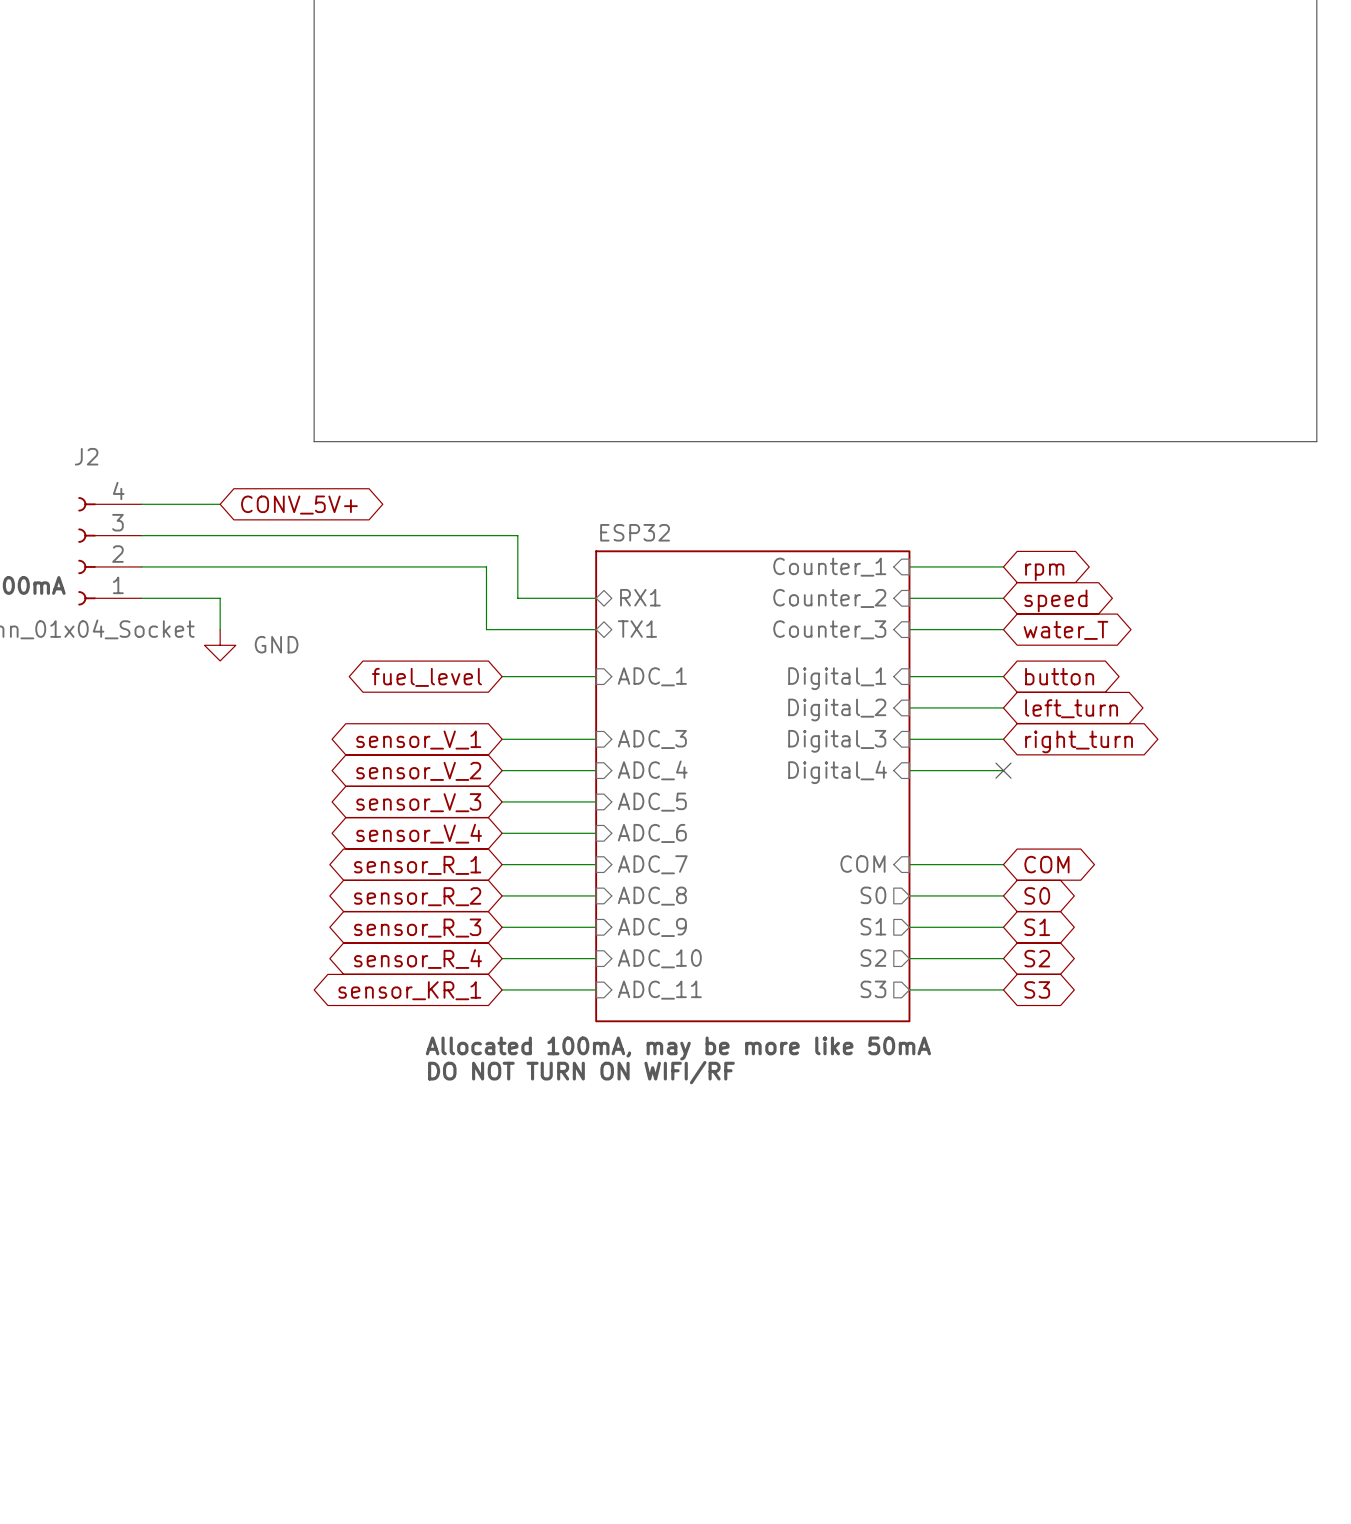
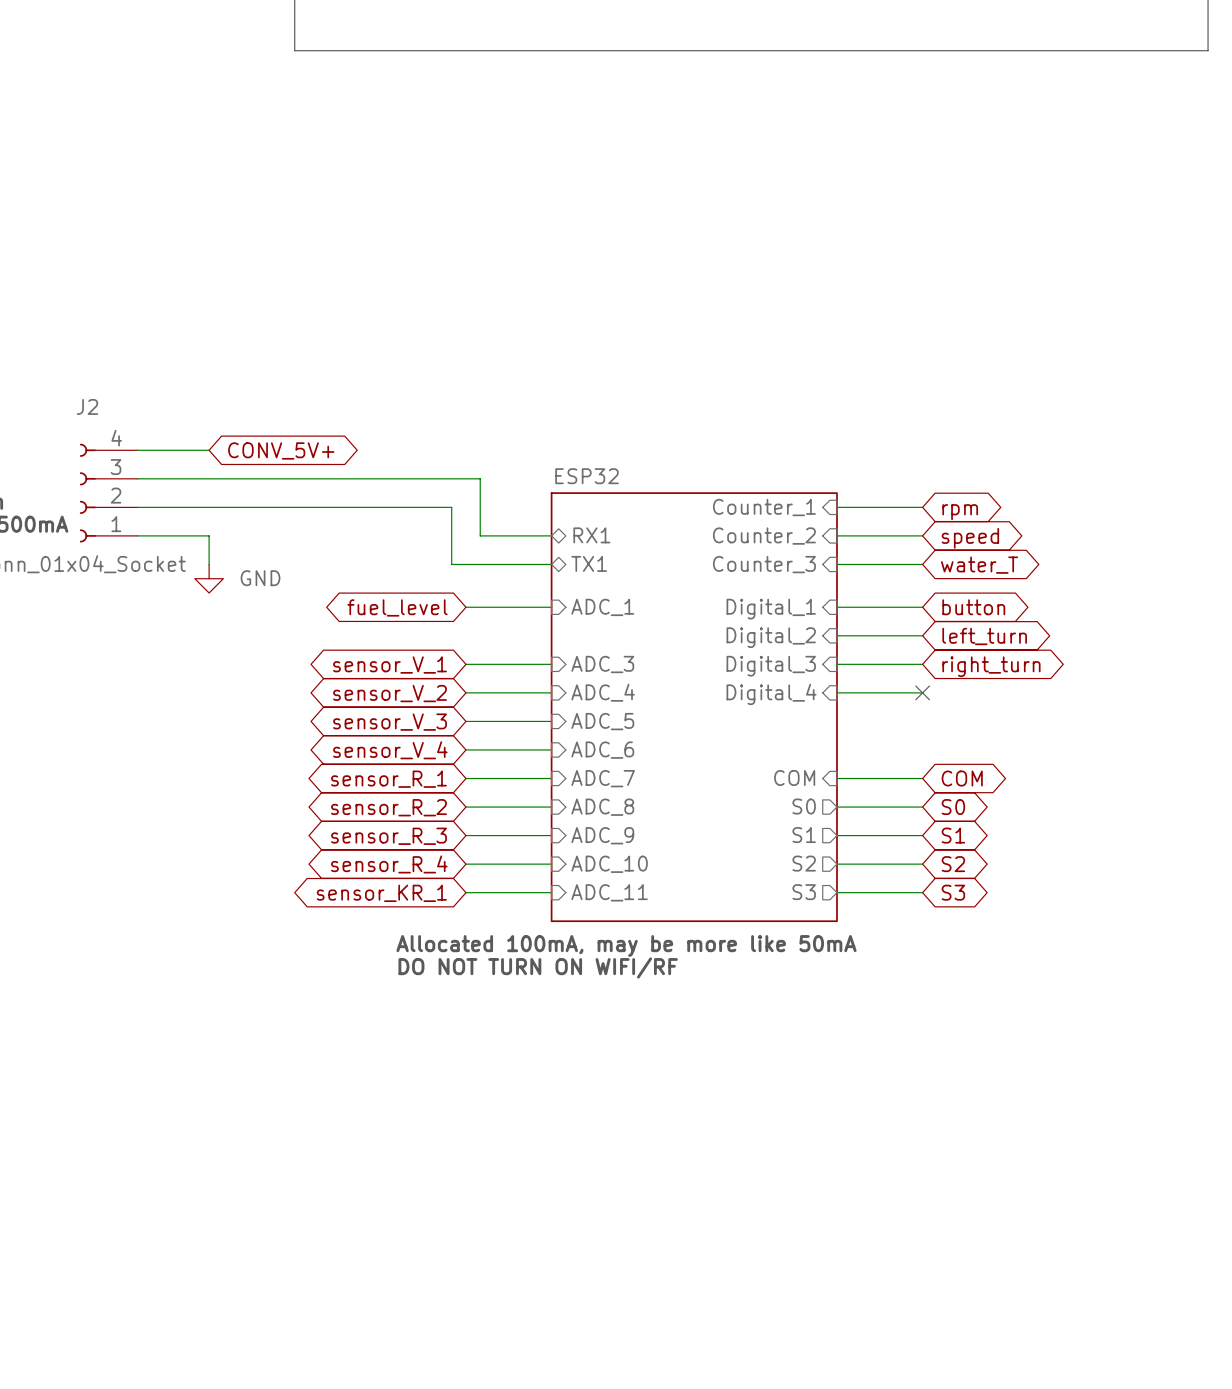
line: (314, 65) (314, 441) (1316, 441) (1316, 65) -> (294, 50) (1208, 50)

